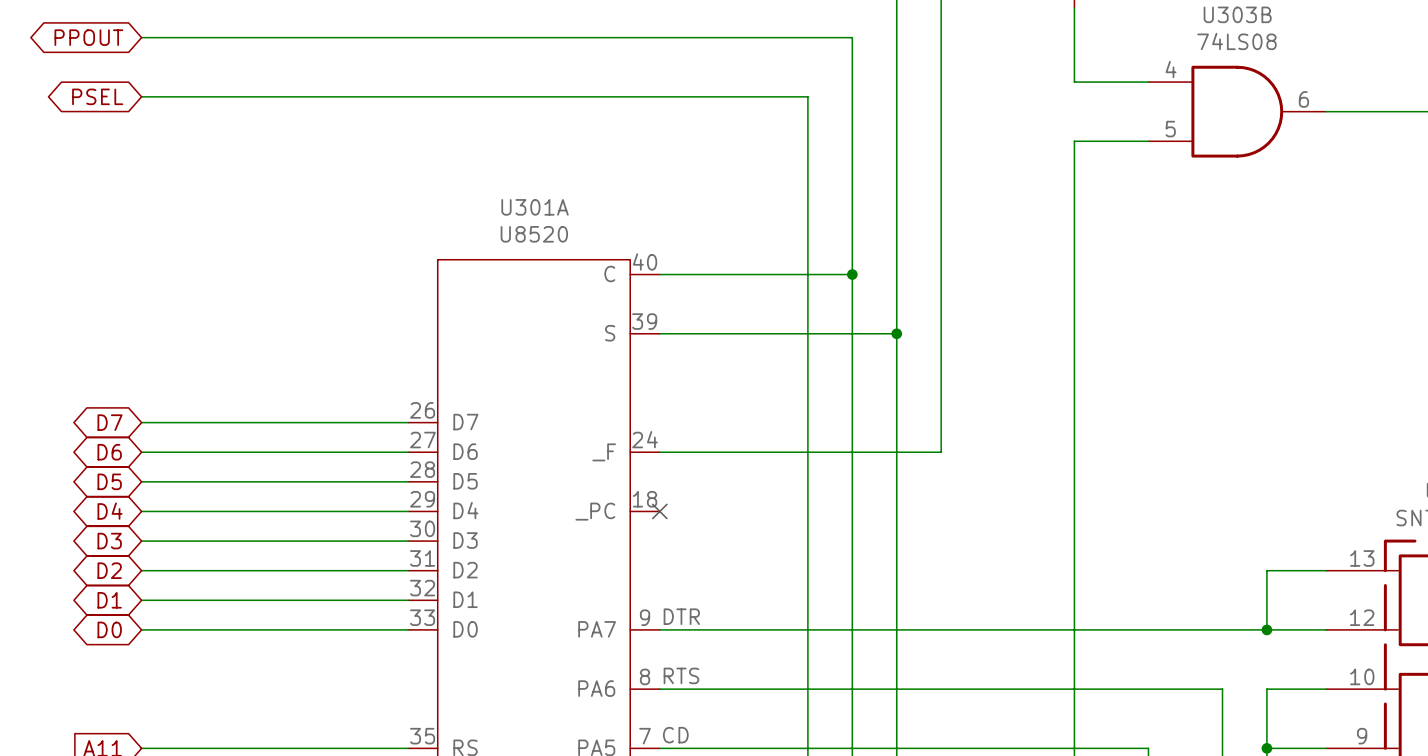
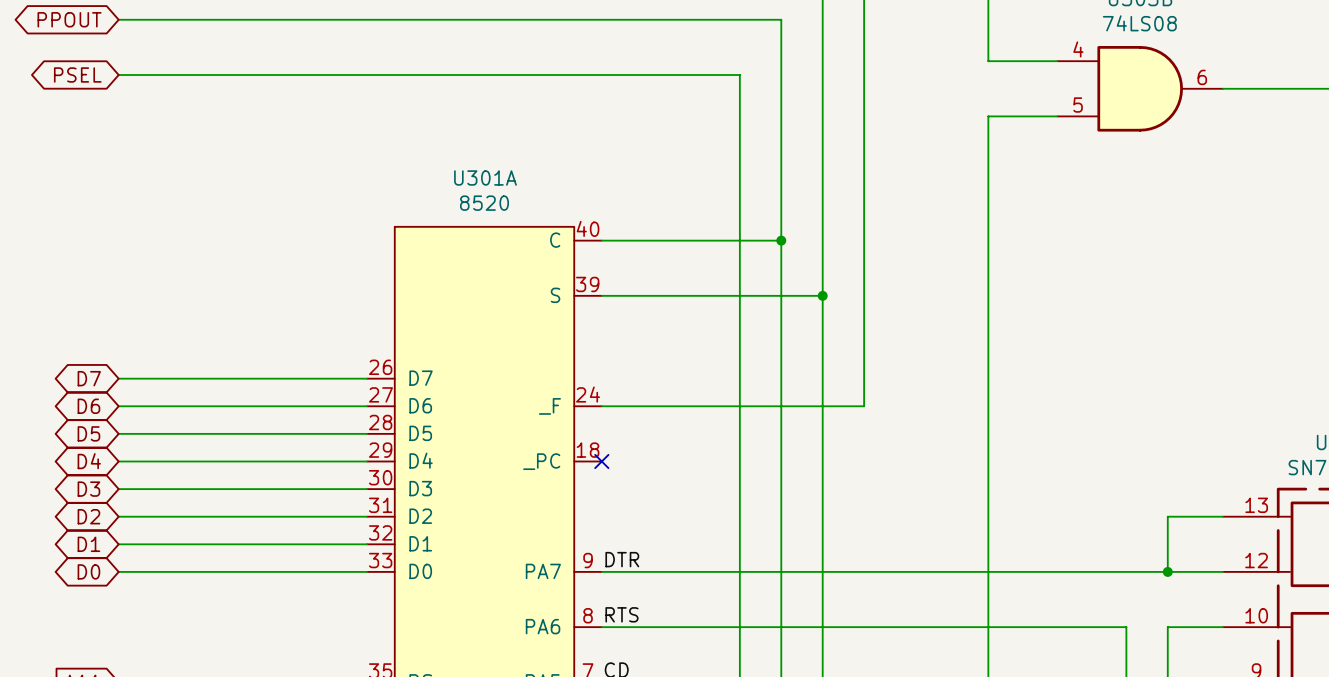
U301A value: U8520 (534, 234) -> 8520 (484, 203)

